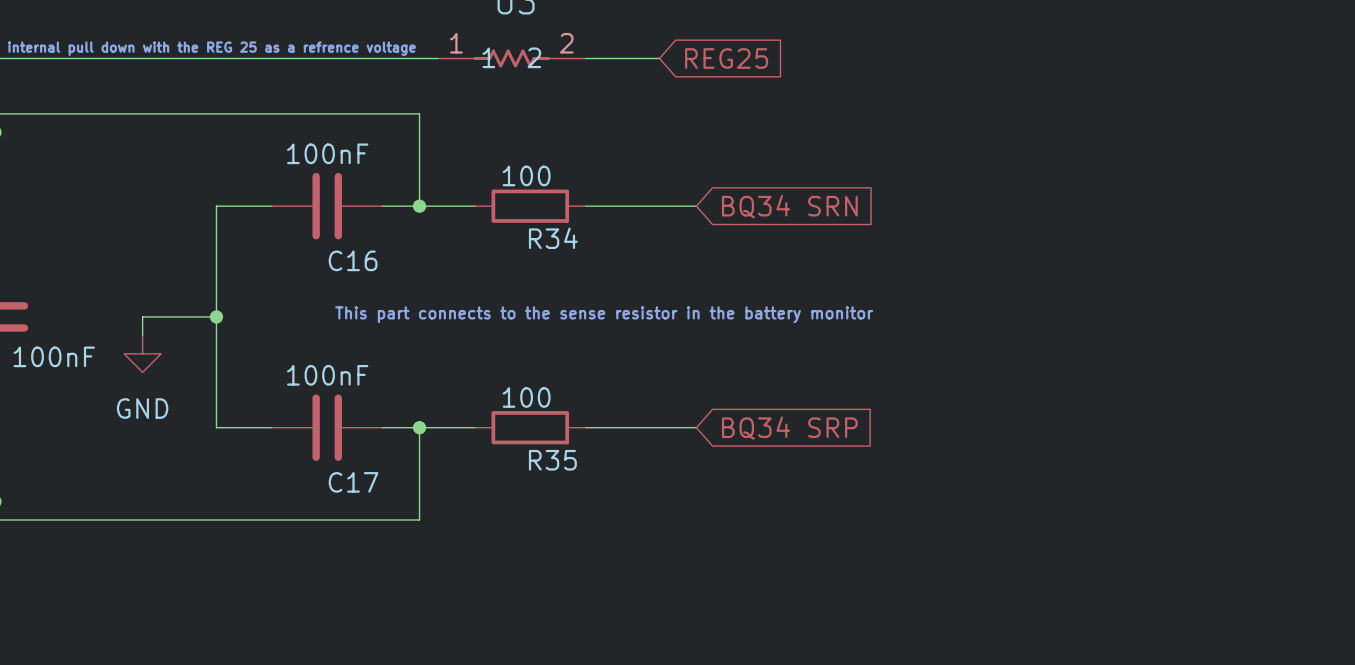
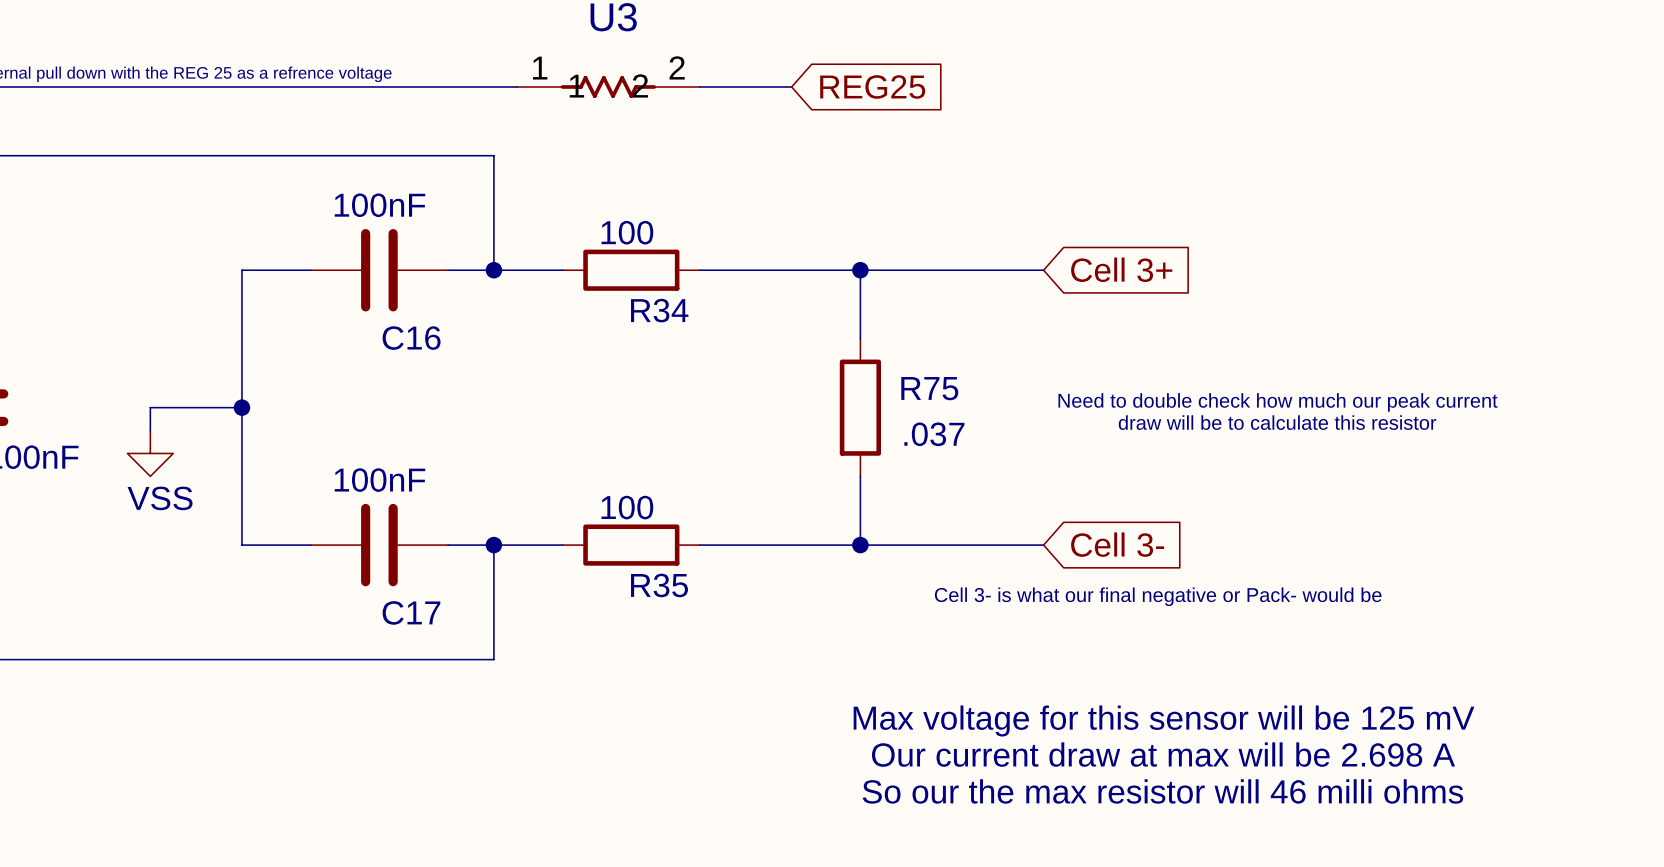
wire: none -> (837, 270) (1043, 270)
wire: none -> (860, 270) (860, 338)
junction: none -> (860, 270)
global label: BQ34 SRN (789, 206) -> none
global label: none -> Cell 3+ (1121, 269)
text: none -> Need to double check how much our peak current (1278, 402)
text: This part connects to the sense resistor in the battery monitor (604, 314) -> none
R75: none -> .037 (860, 407)
text: none -> draw will be to calculate this resistor (1277, 422)
power symbol: GND (142, 353) -> VSS (150, 453)
wire: none -> (860, 476) (860, 545)
wire: none -> (837, 545) (1043, 545)
junction: none -> (860, 545)
global label: none -> Cell 3- (1117, 544)
global label: BQ34 SRP (789, 428) -> none
text: none -> Cell 3- is what our final negative or Pack- would be (1158, 596)
text: none -> Max voltage for this sensor will be 125 mV (1164, 720)
text: none -> Our current draw at max will be 2.698 A (1163, 754)
text: none -> So our the max resistor will 46 milli ohms (1162, 791)

